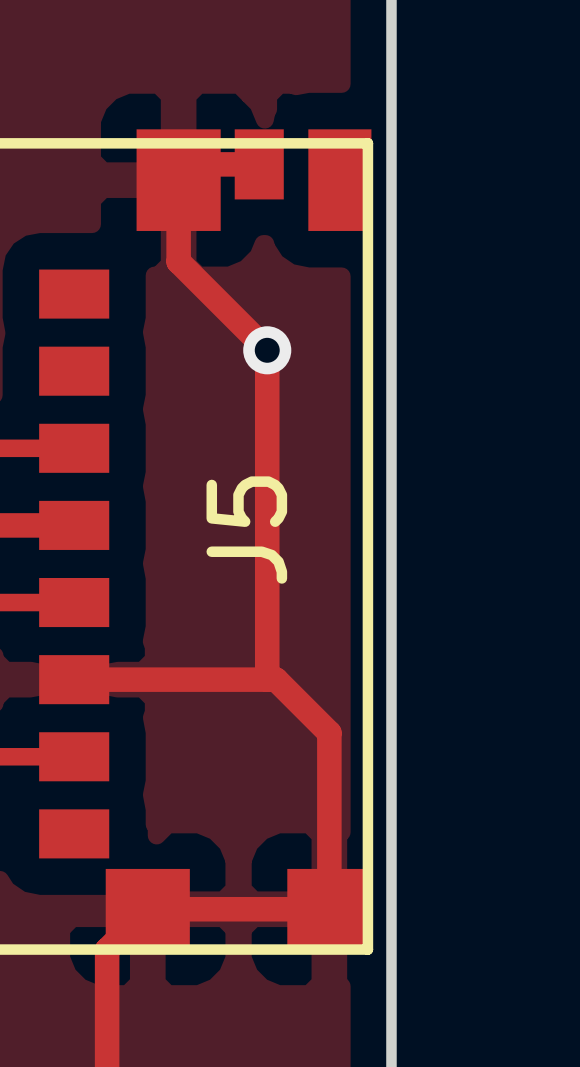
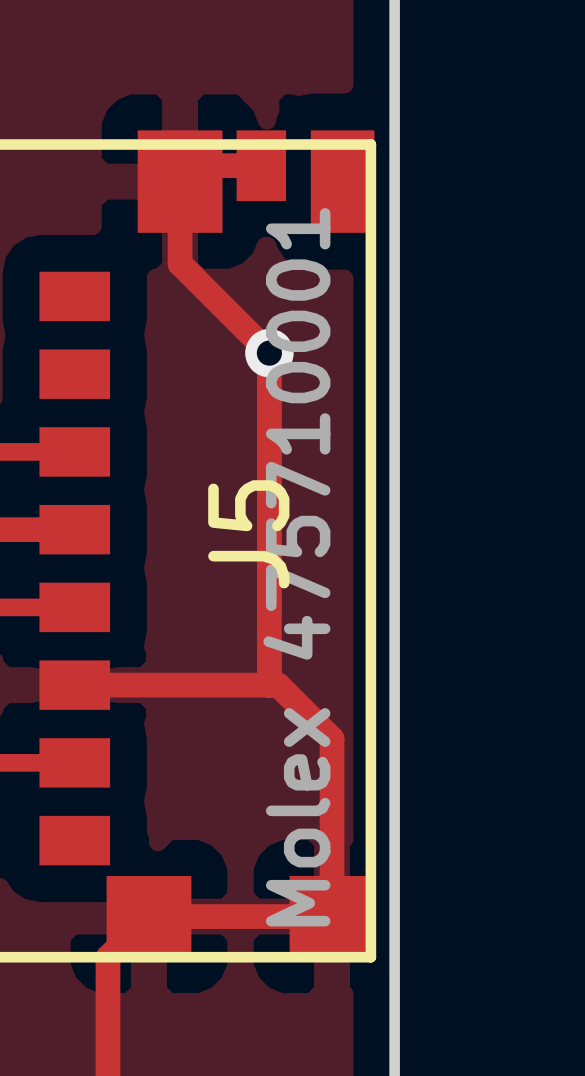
J5 value: none -> Molex 475710001 (296, 567)

